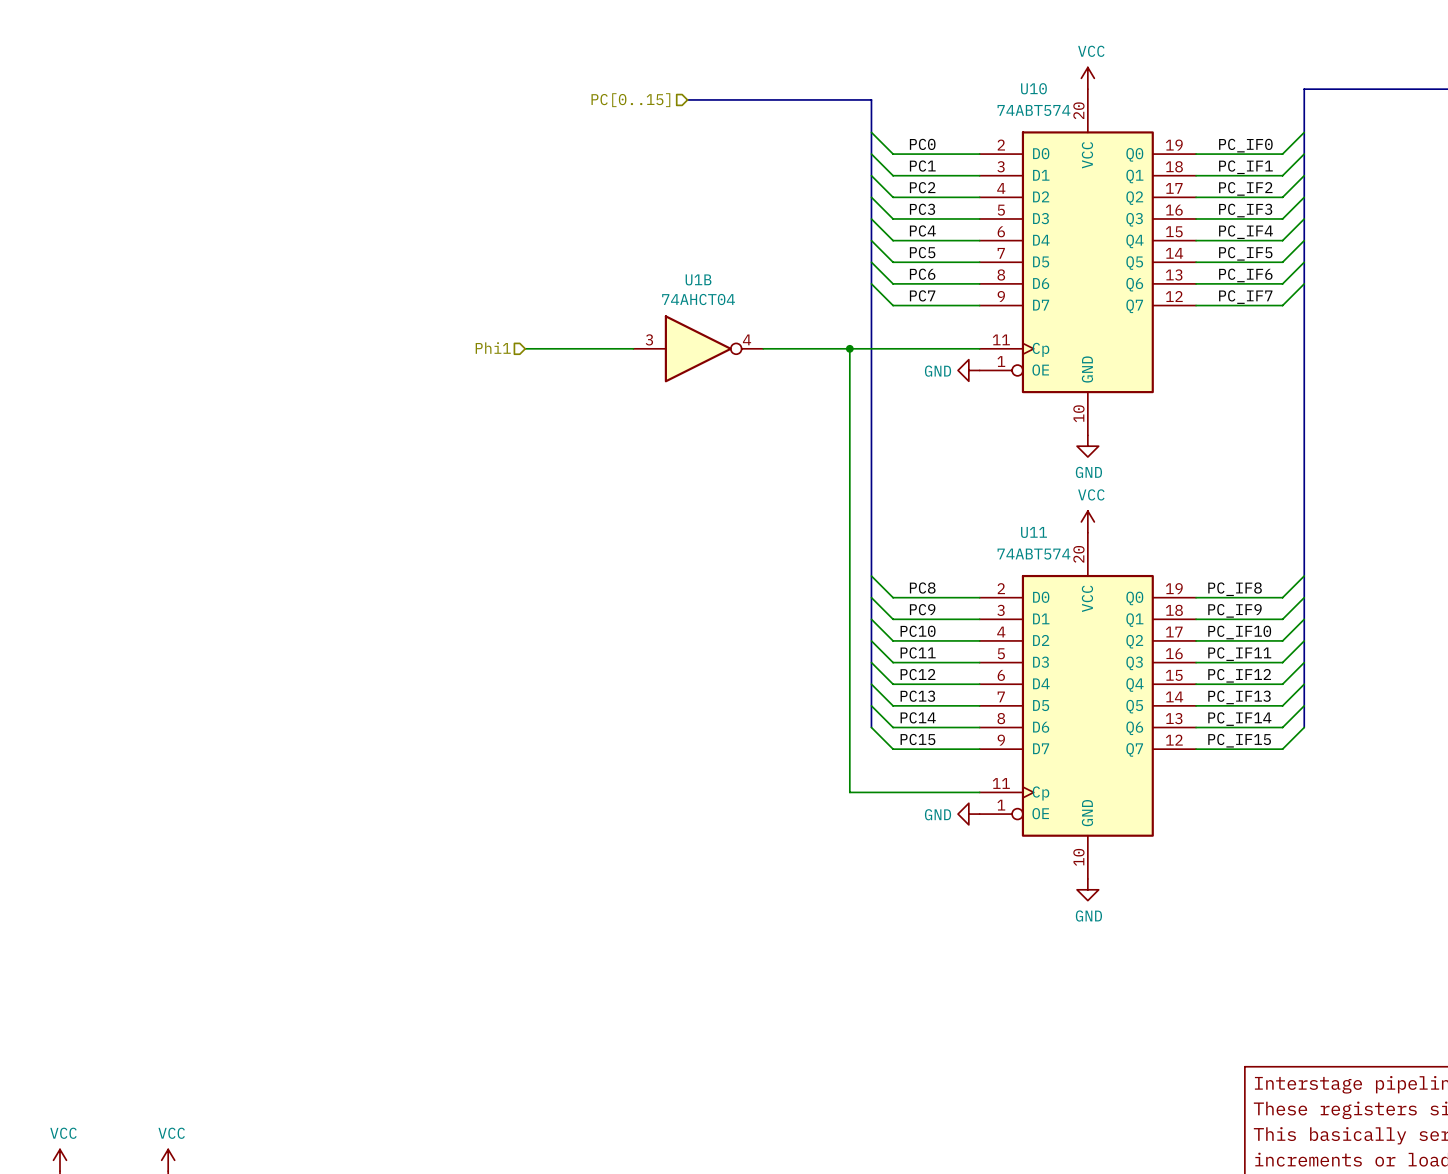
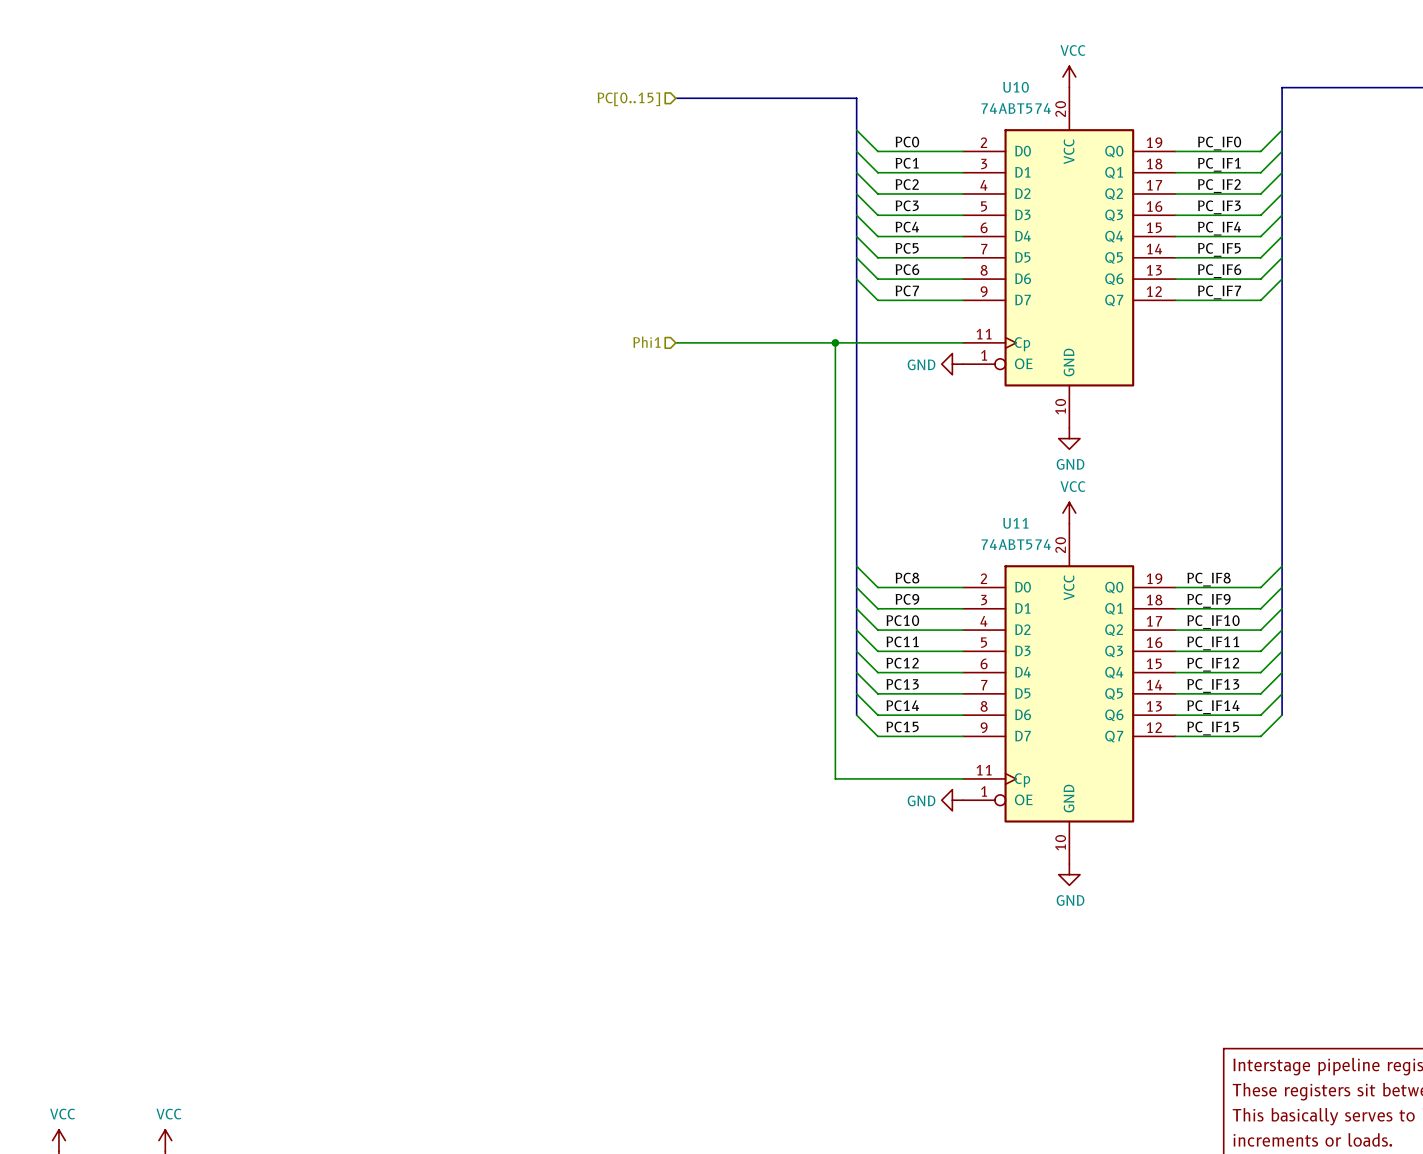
hierarchical label position: Phi1 (493, 348) -> Phi1 (646, 342)
wire: (525, 348) (633, 348) -> none
U1B: 74AHCT04 (698, 348) -> none

